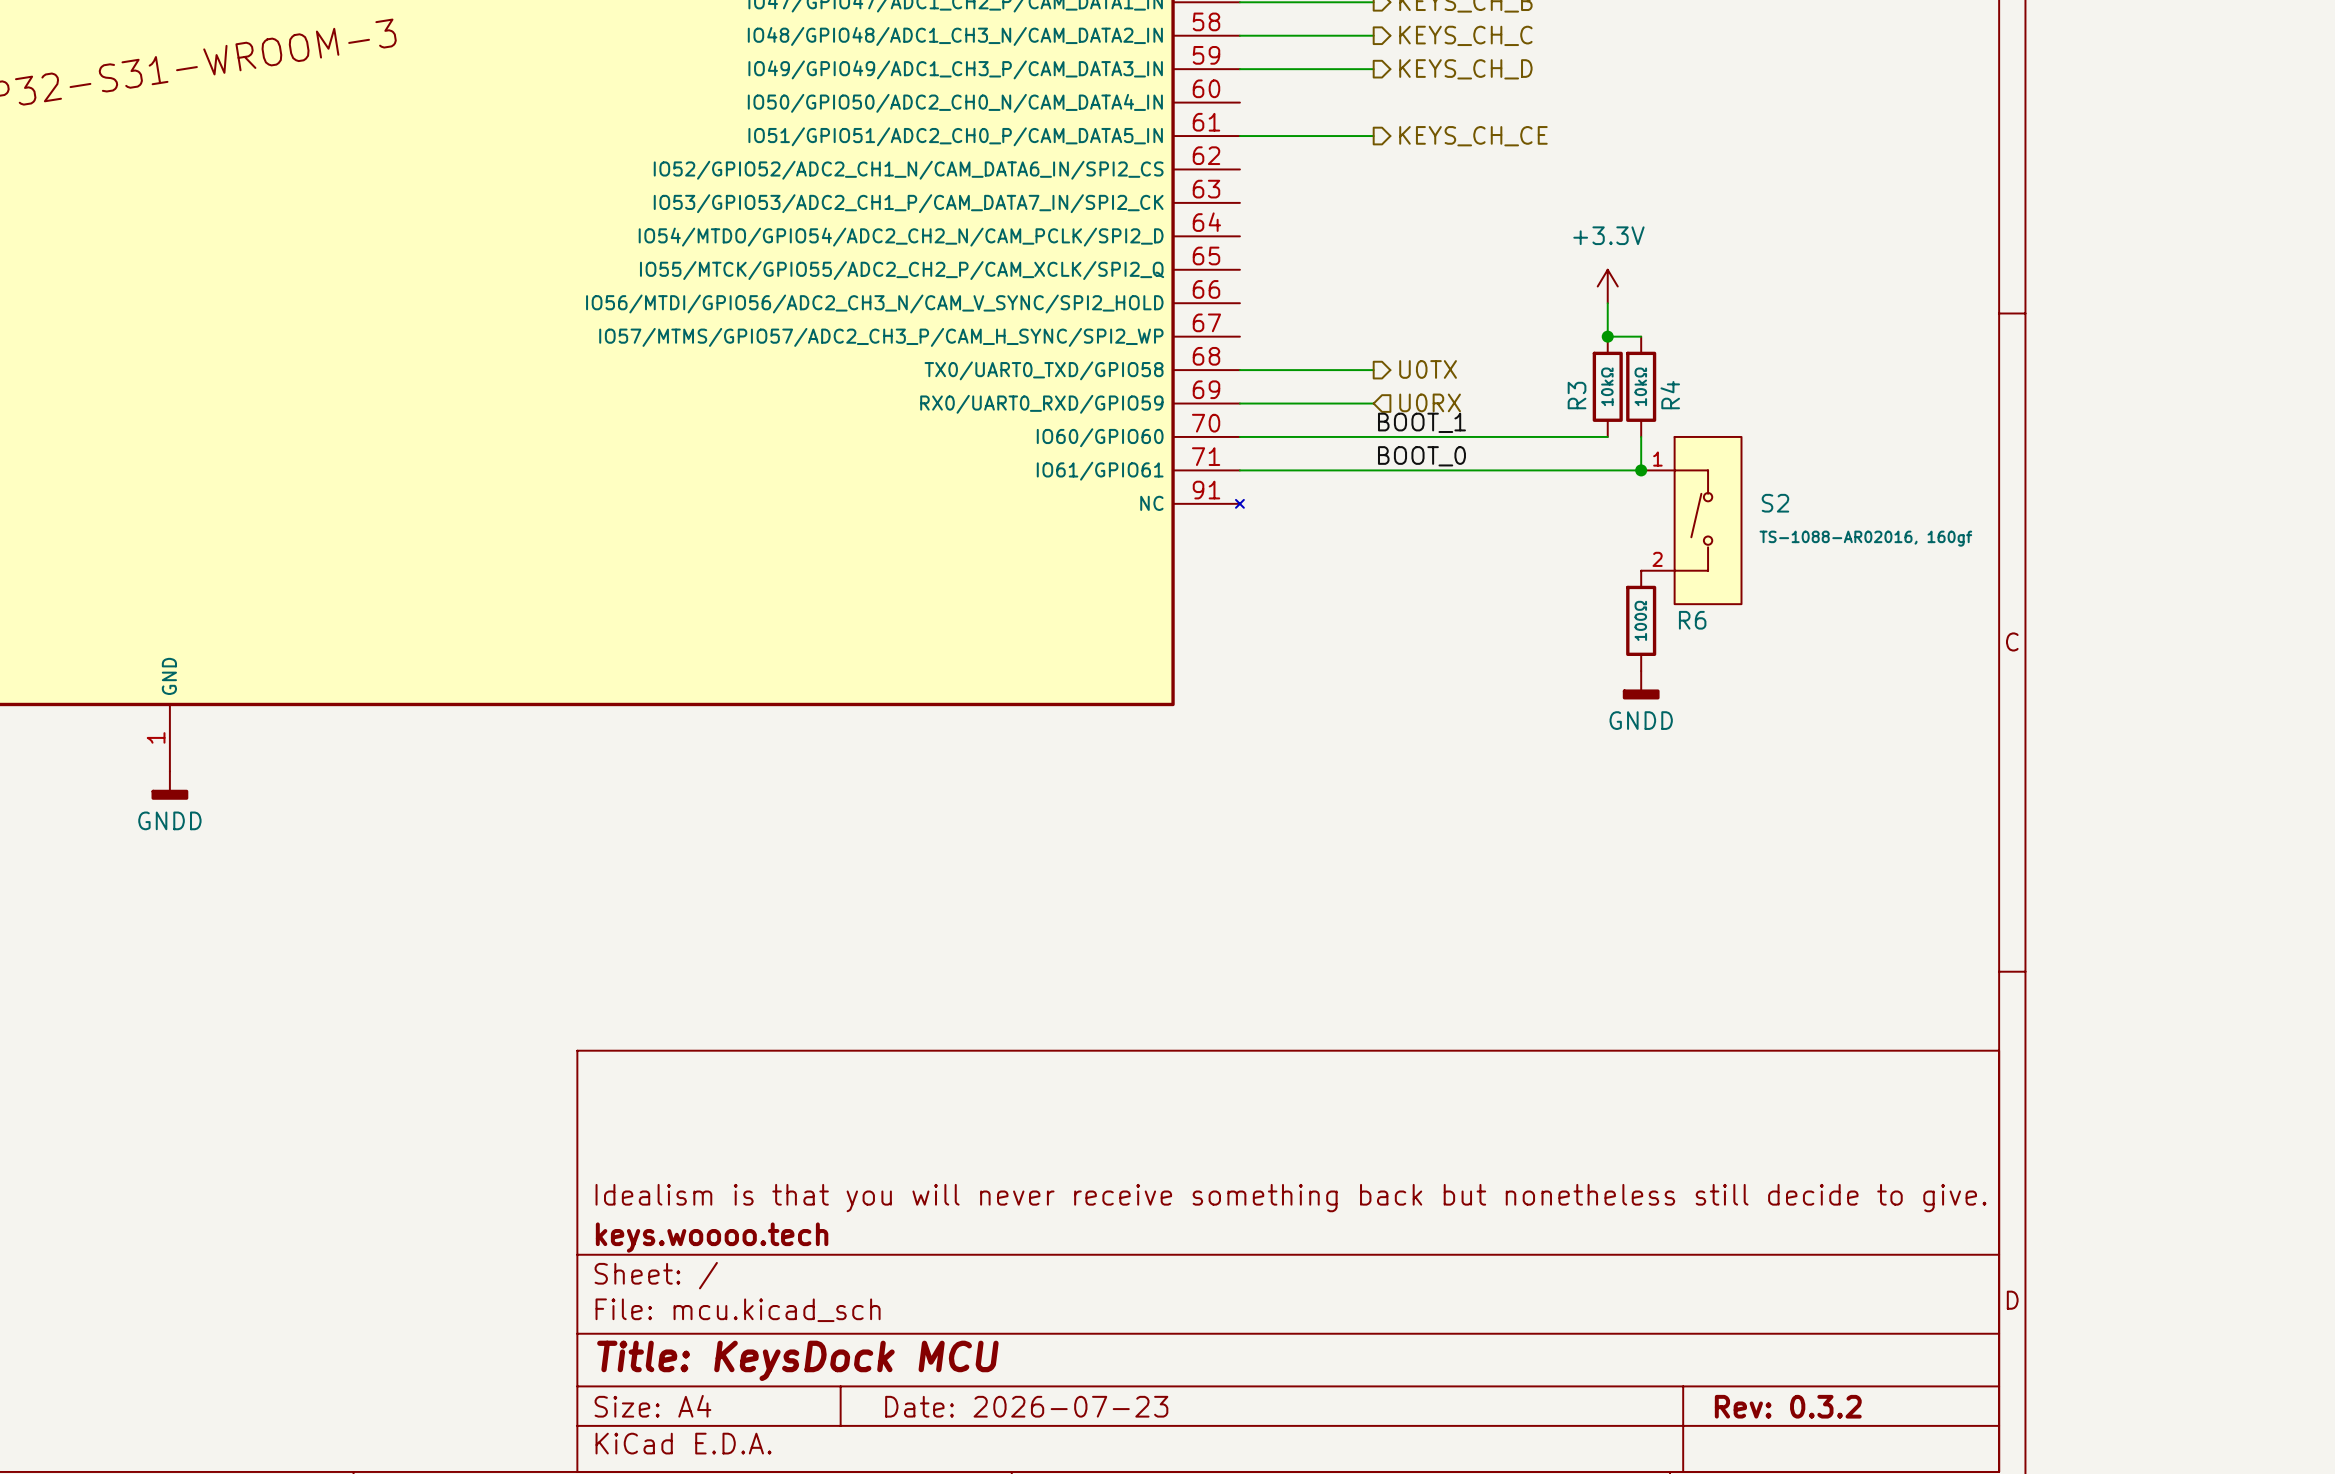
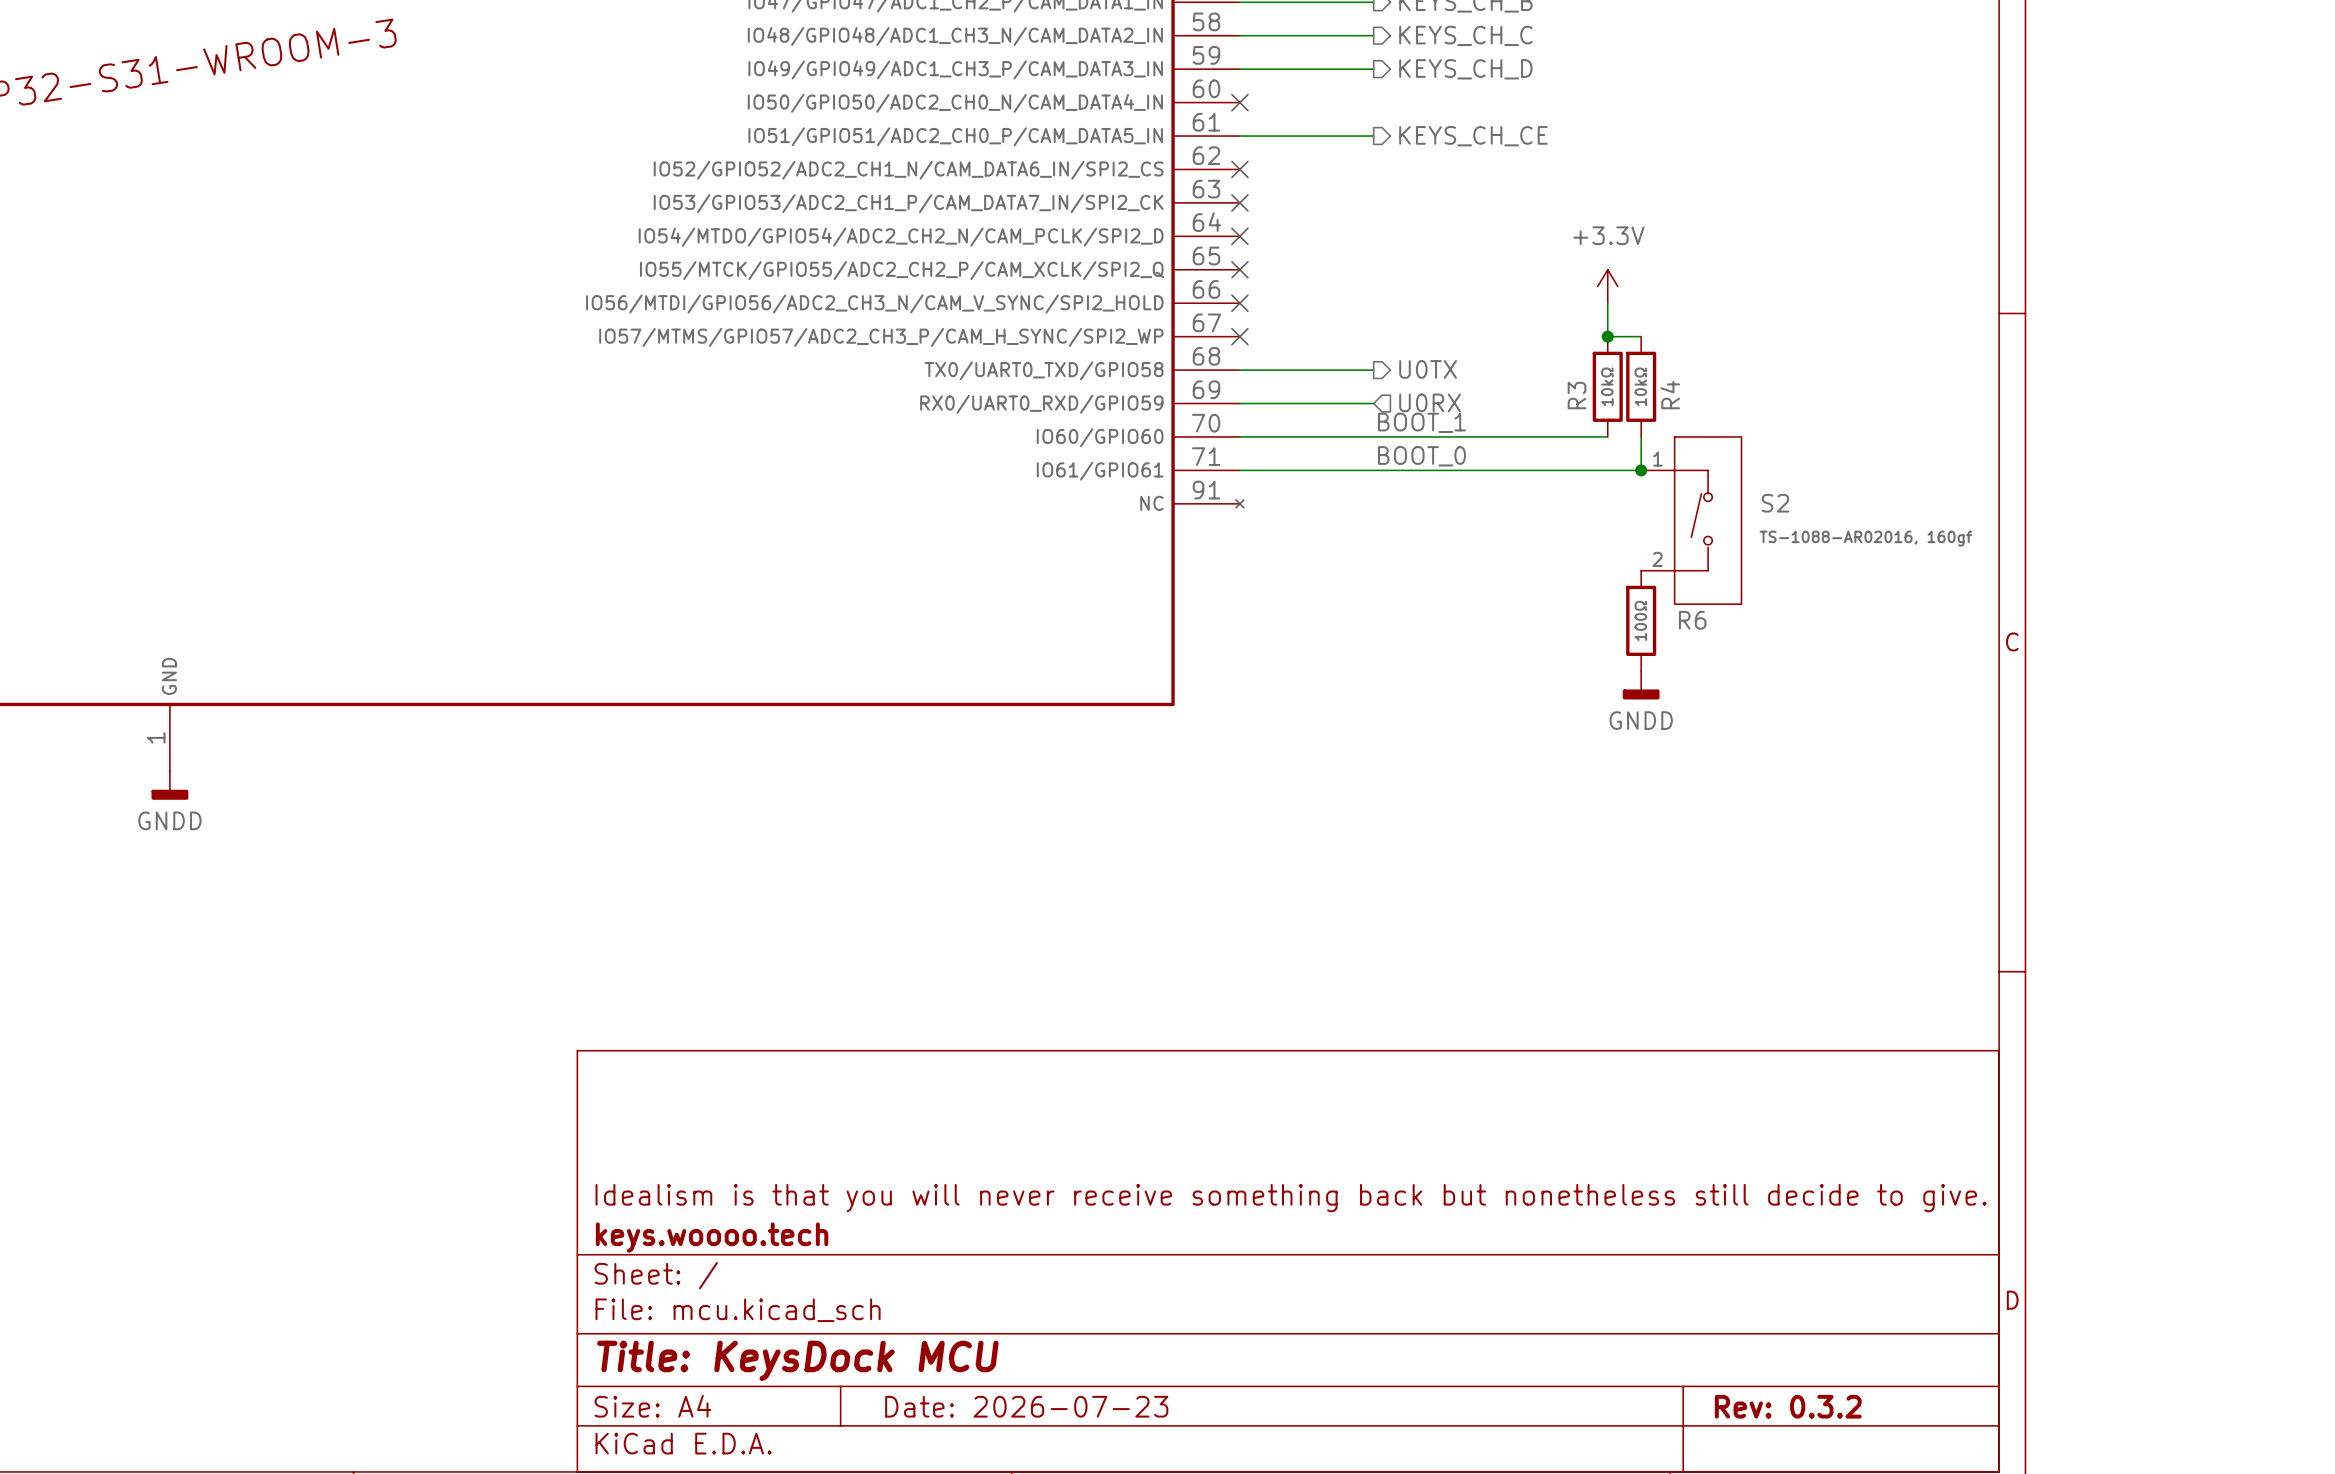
no-connect mark: none -> (1239, 102)
no-connect mark: none -> (1239, 169)
no-connect mark: none -> (1239, 202)
no-connect mark: none -> (1239, 236)
no-connect mark: none -> (1239, 269)
no-connect mark: none -> (1239, 303)
no-connect mark: none -> (1239, 336)

